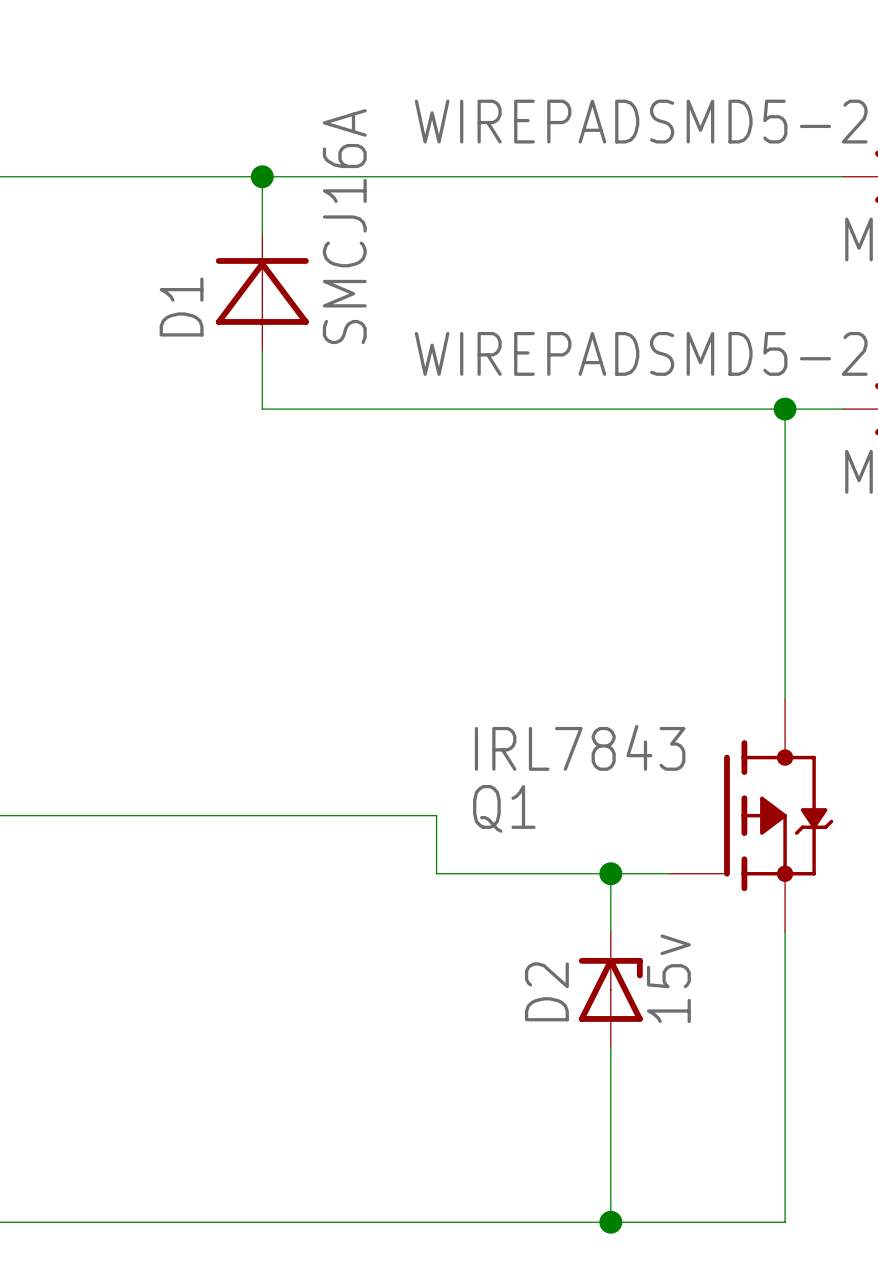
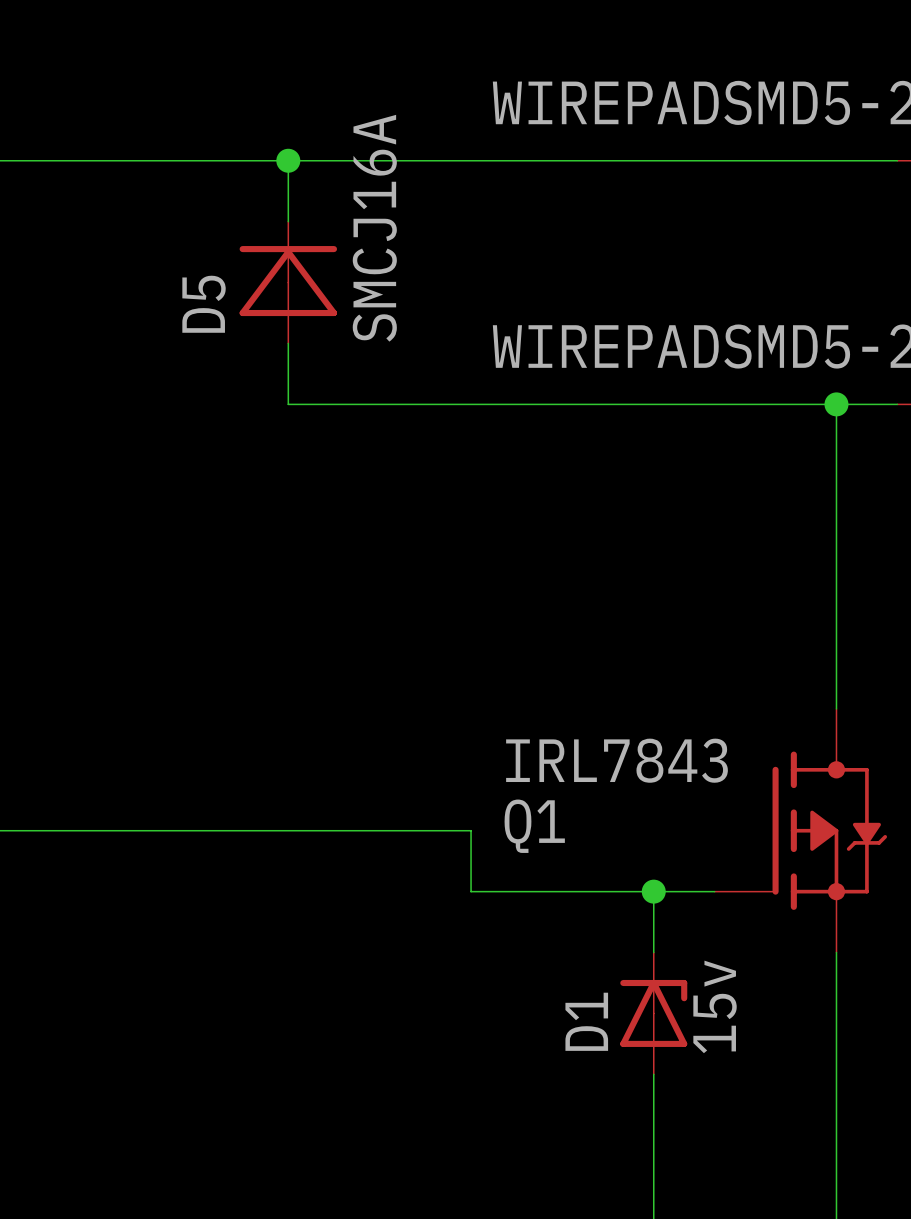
D1 name: D1 (181, 307) -> D5 (204, 304)
D2 name: D2 (546, 991) -> D1 (586, 1021)

